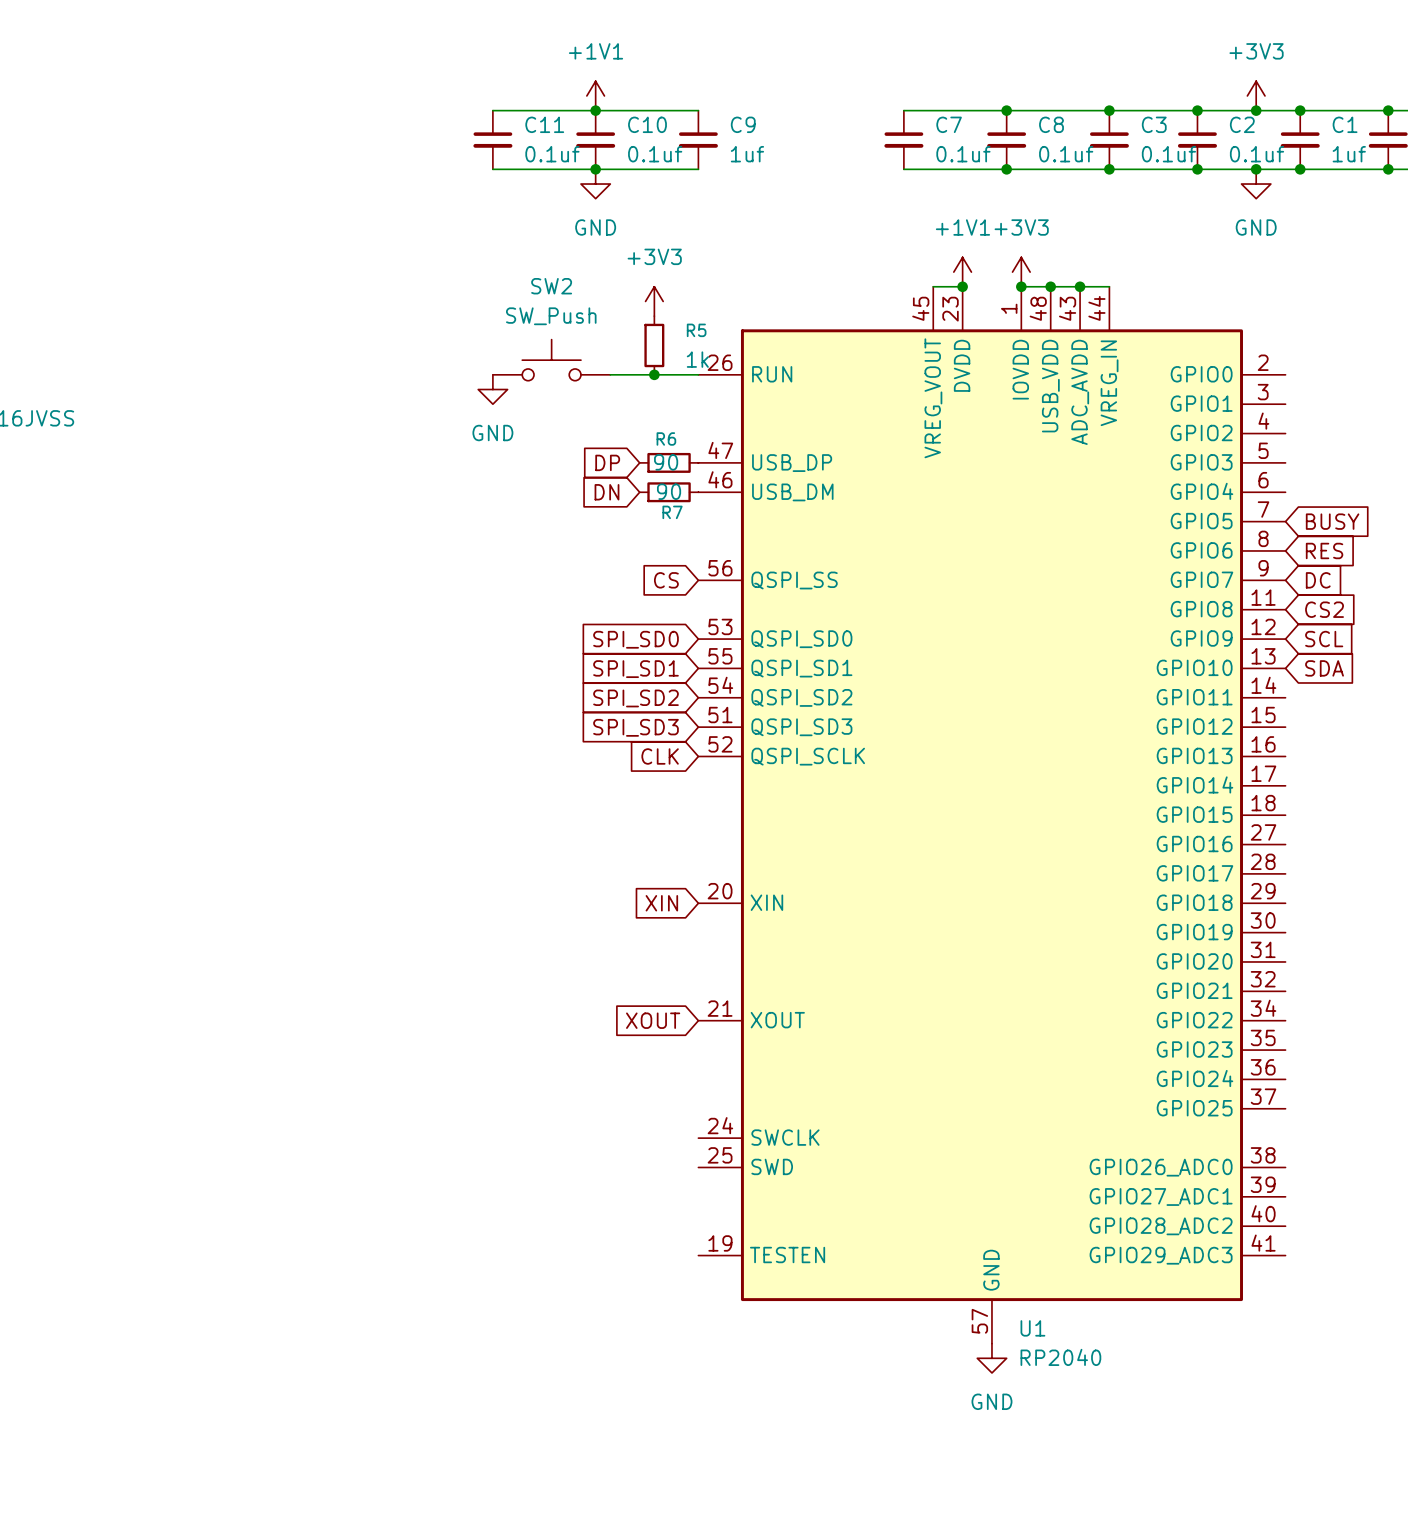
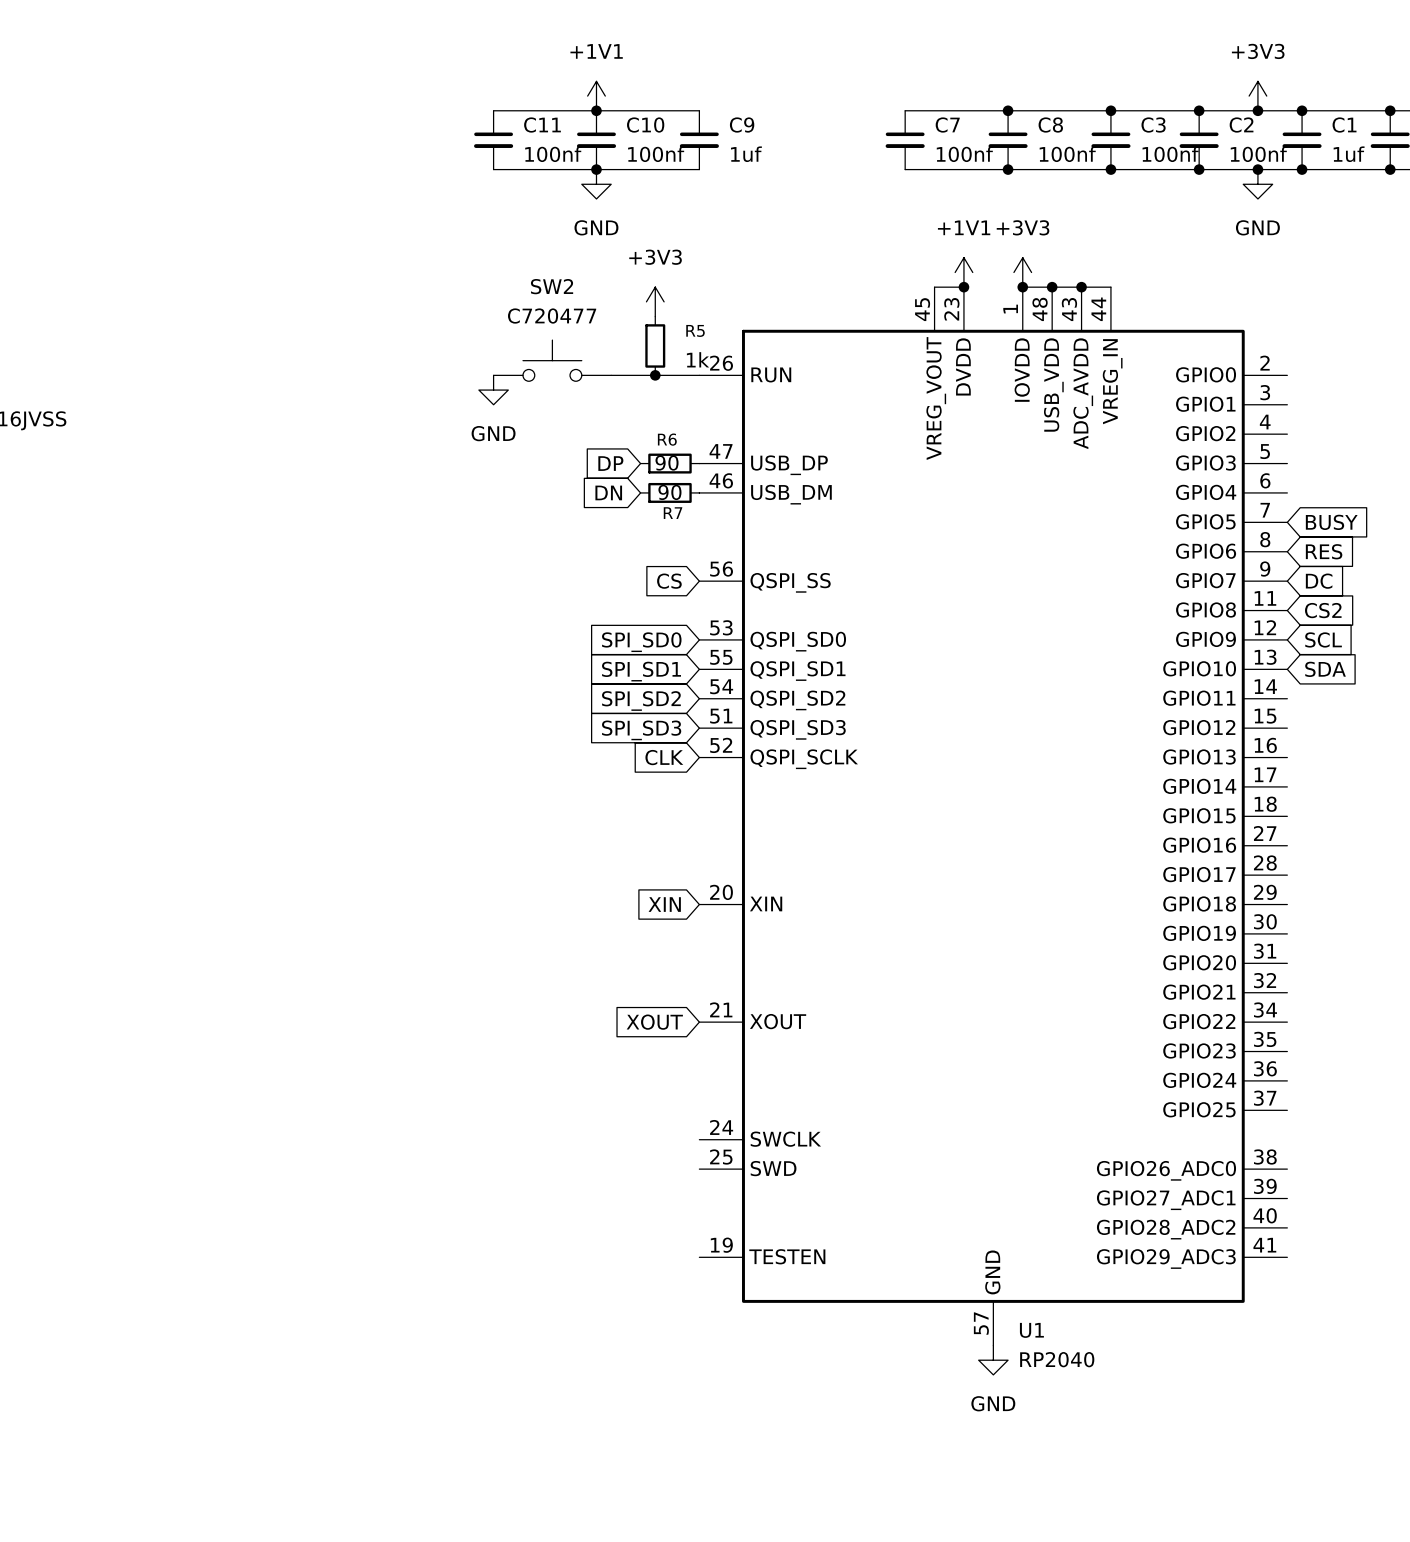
C11 value: 0.1uf (552, 154) -> 100nf (553, 154)
C10 value: 0.1uf (655, 154) -> 100nf (656, 154)
C7 value: 0.1uf (963, 154) -> 100nf (965, 154)
C8 value: 0.1uf (1066, 154) -> 100nf (1067, 154)
C3 value: 0.1uf (1168, 154) -> 100nf (1170, 154)
C2 value: 0.1uf (1257, 154) -> 100nf (1259, 154)
SW2 value: SW_Push (551, 316) -> C720477 (552, 316)

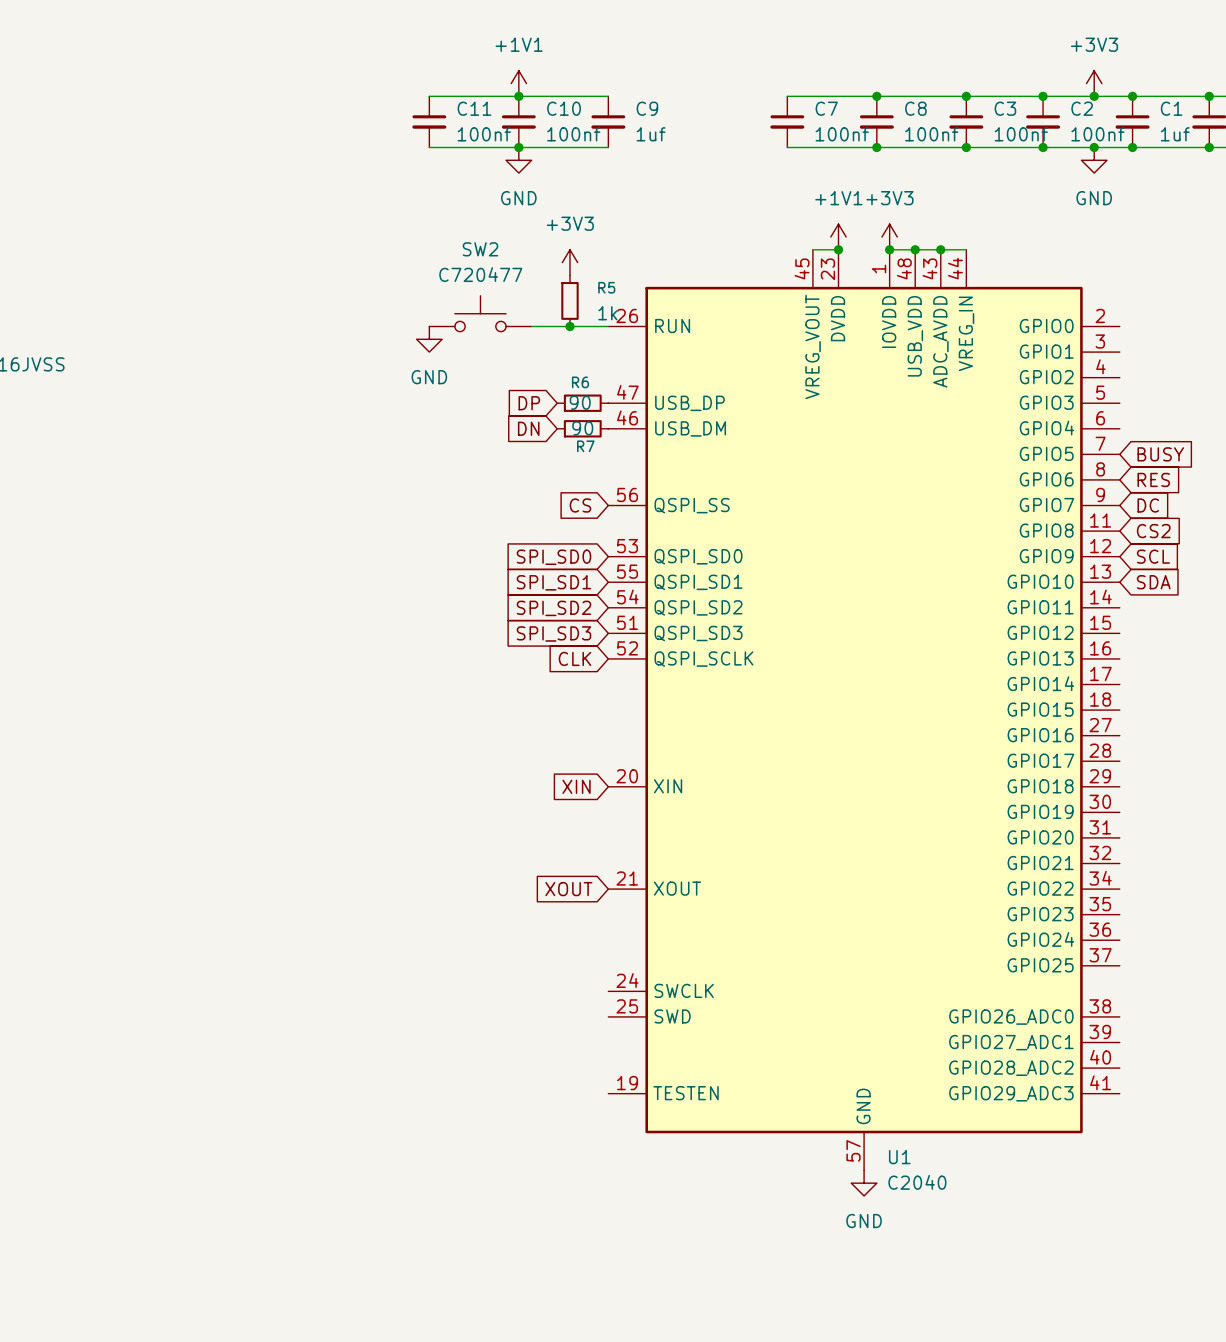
U1 value: RP2040 (1057, 1359) -> C2040 (917, 1182)

